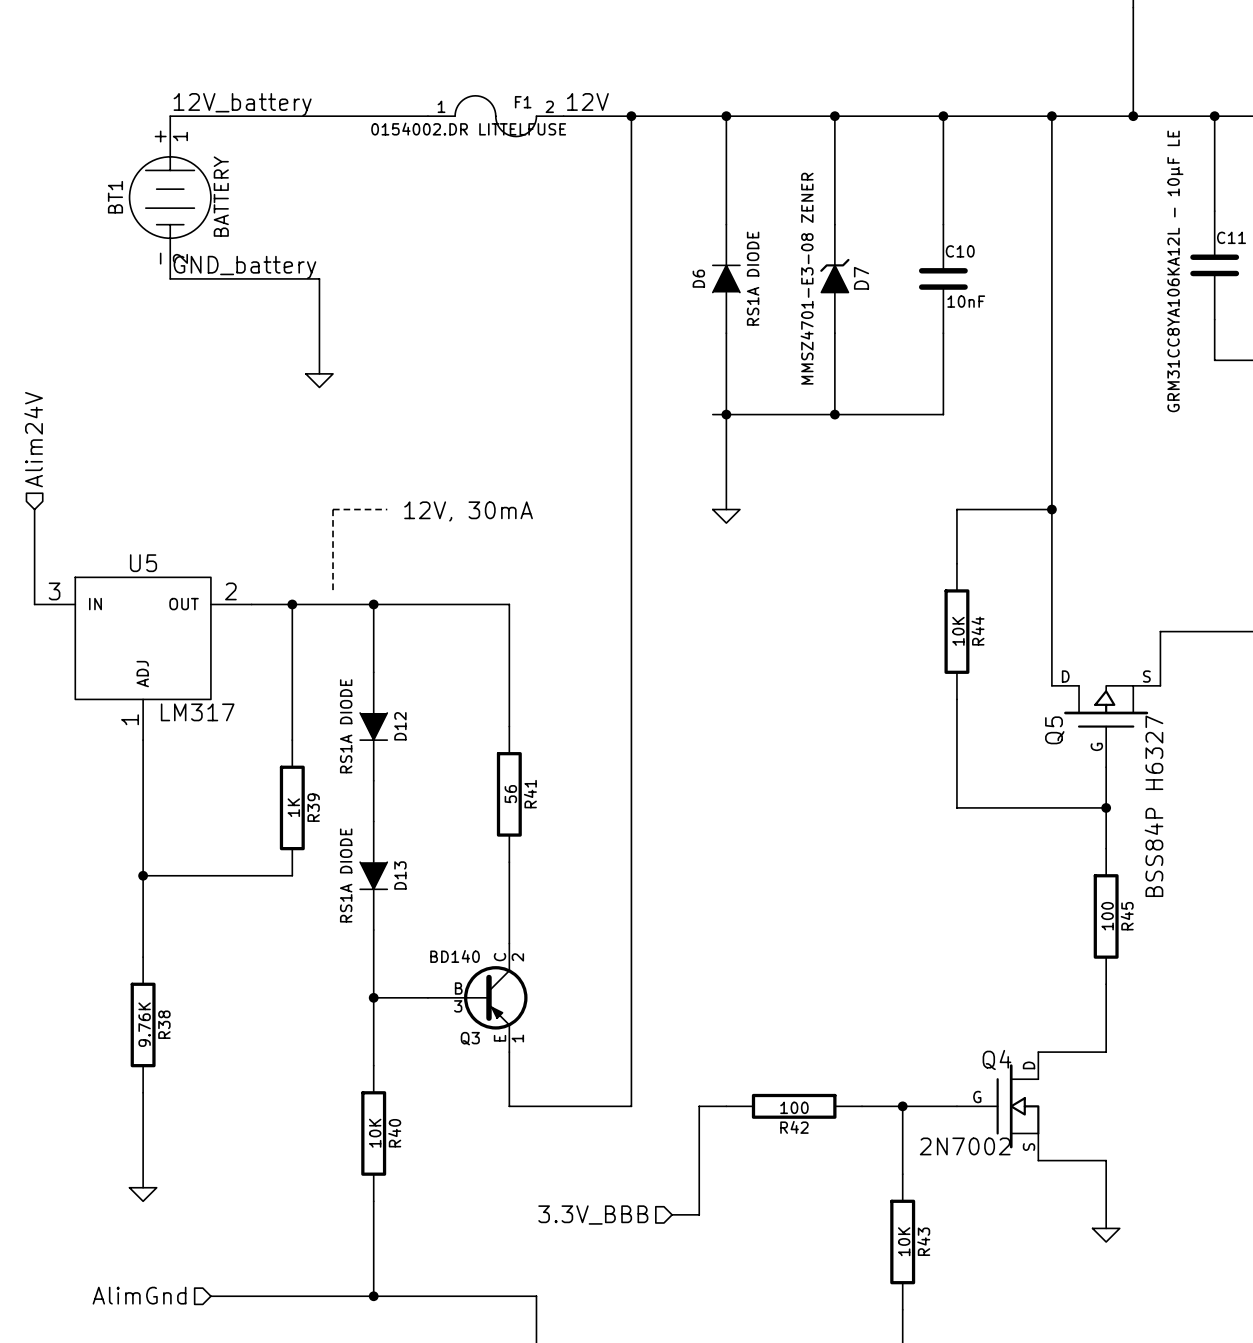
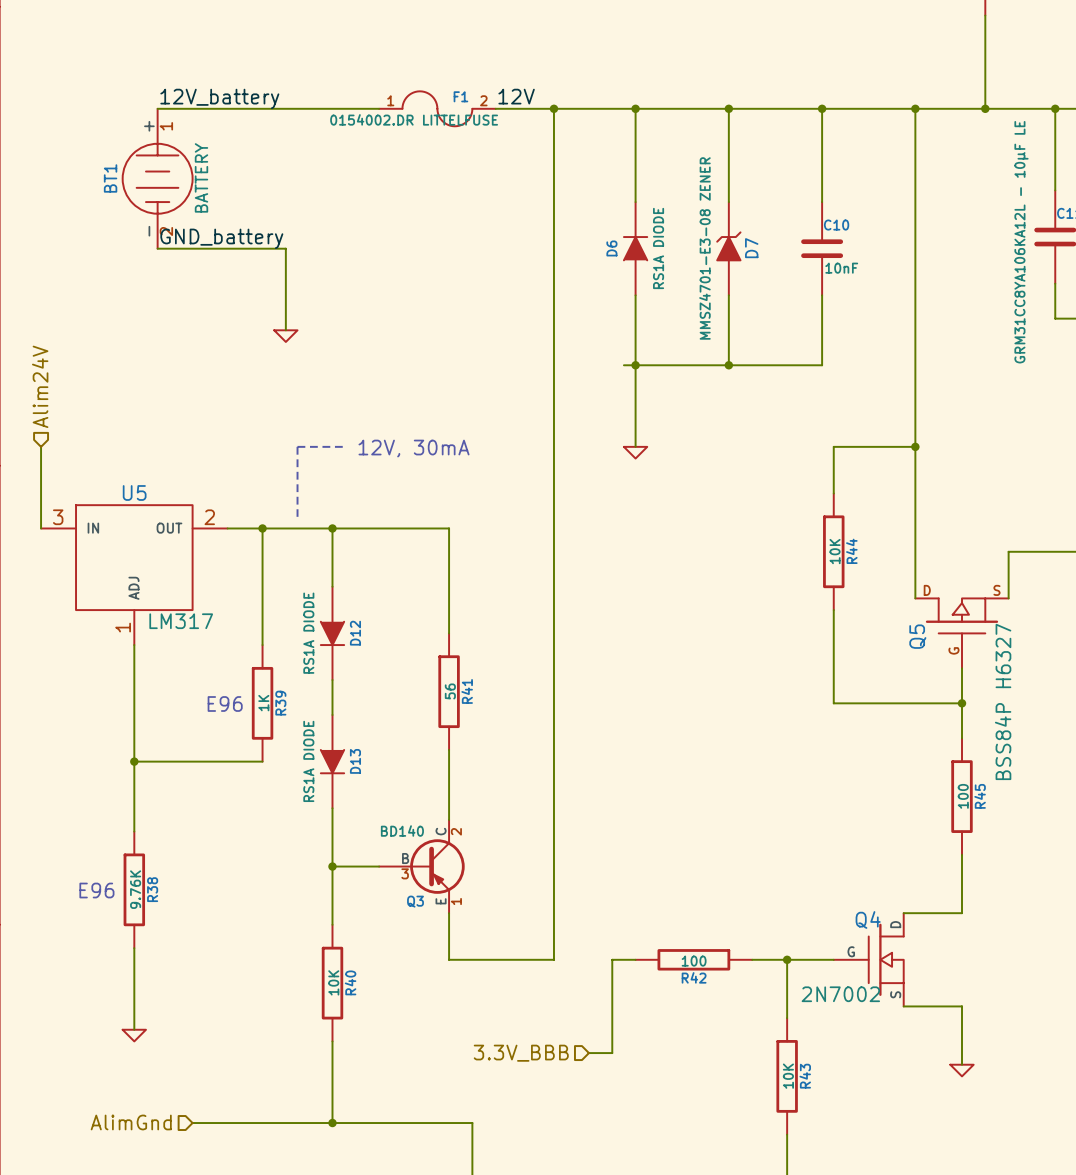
text: none -> E96 (225, 703)
text: none -> E96 (96, 890)

